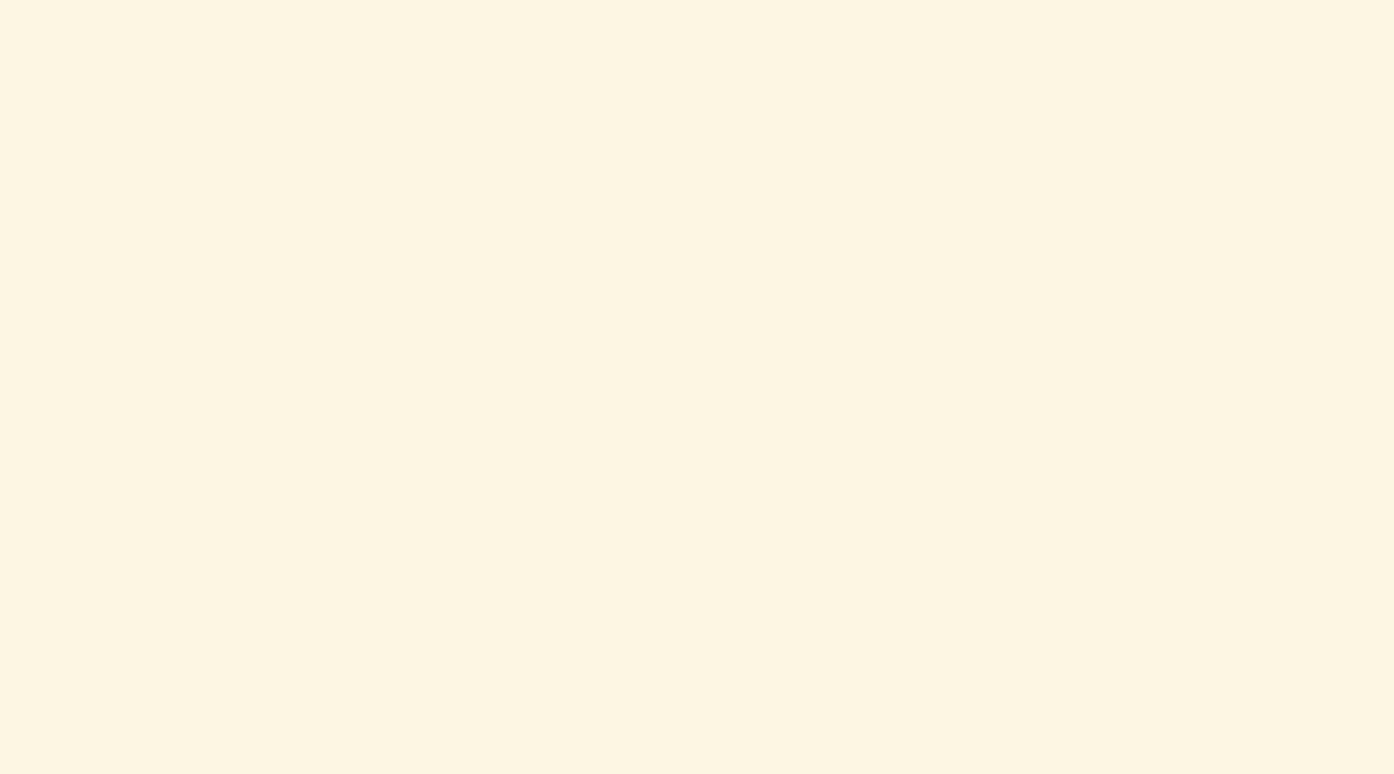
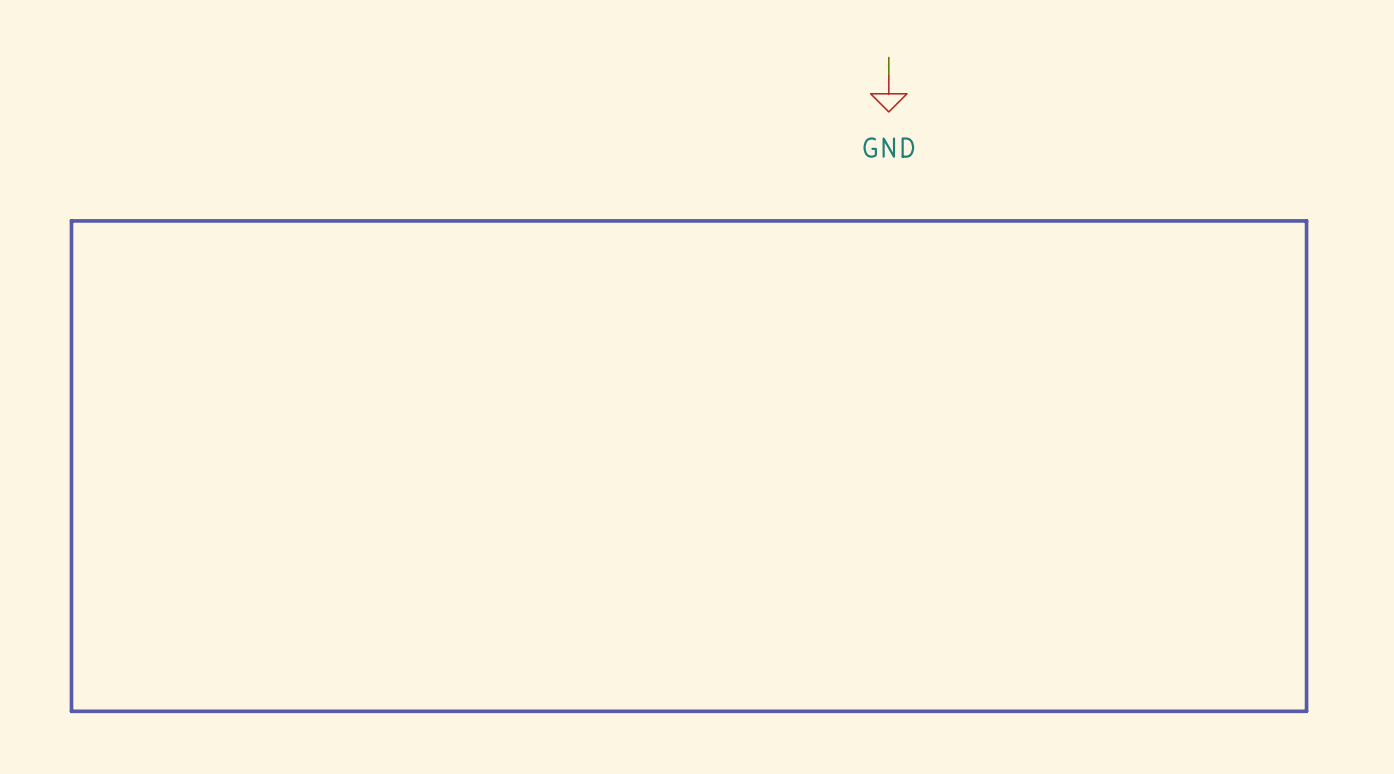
wire: none -> (888, 57) (888, 75)
power symbol: none -> GND (888, 93)
line: none -> (71, 220) (1306, 220) (1306, 711) (71, 711) (71, 220)

